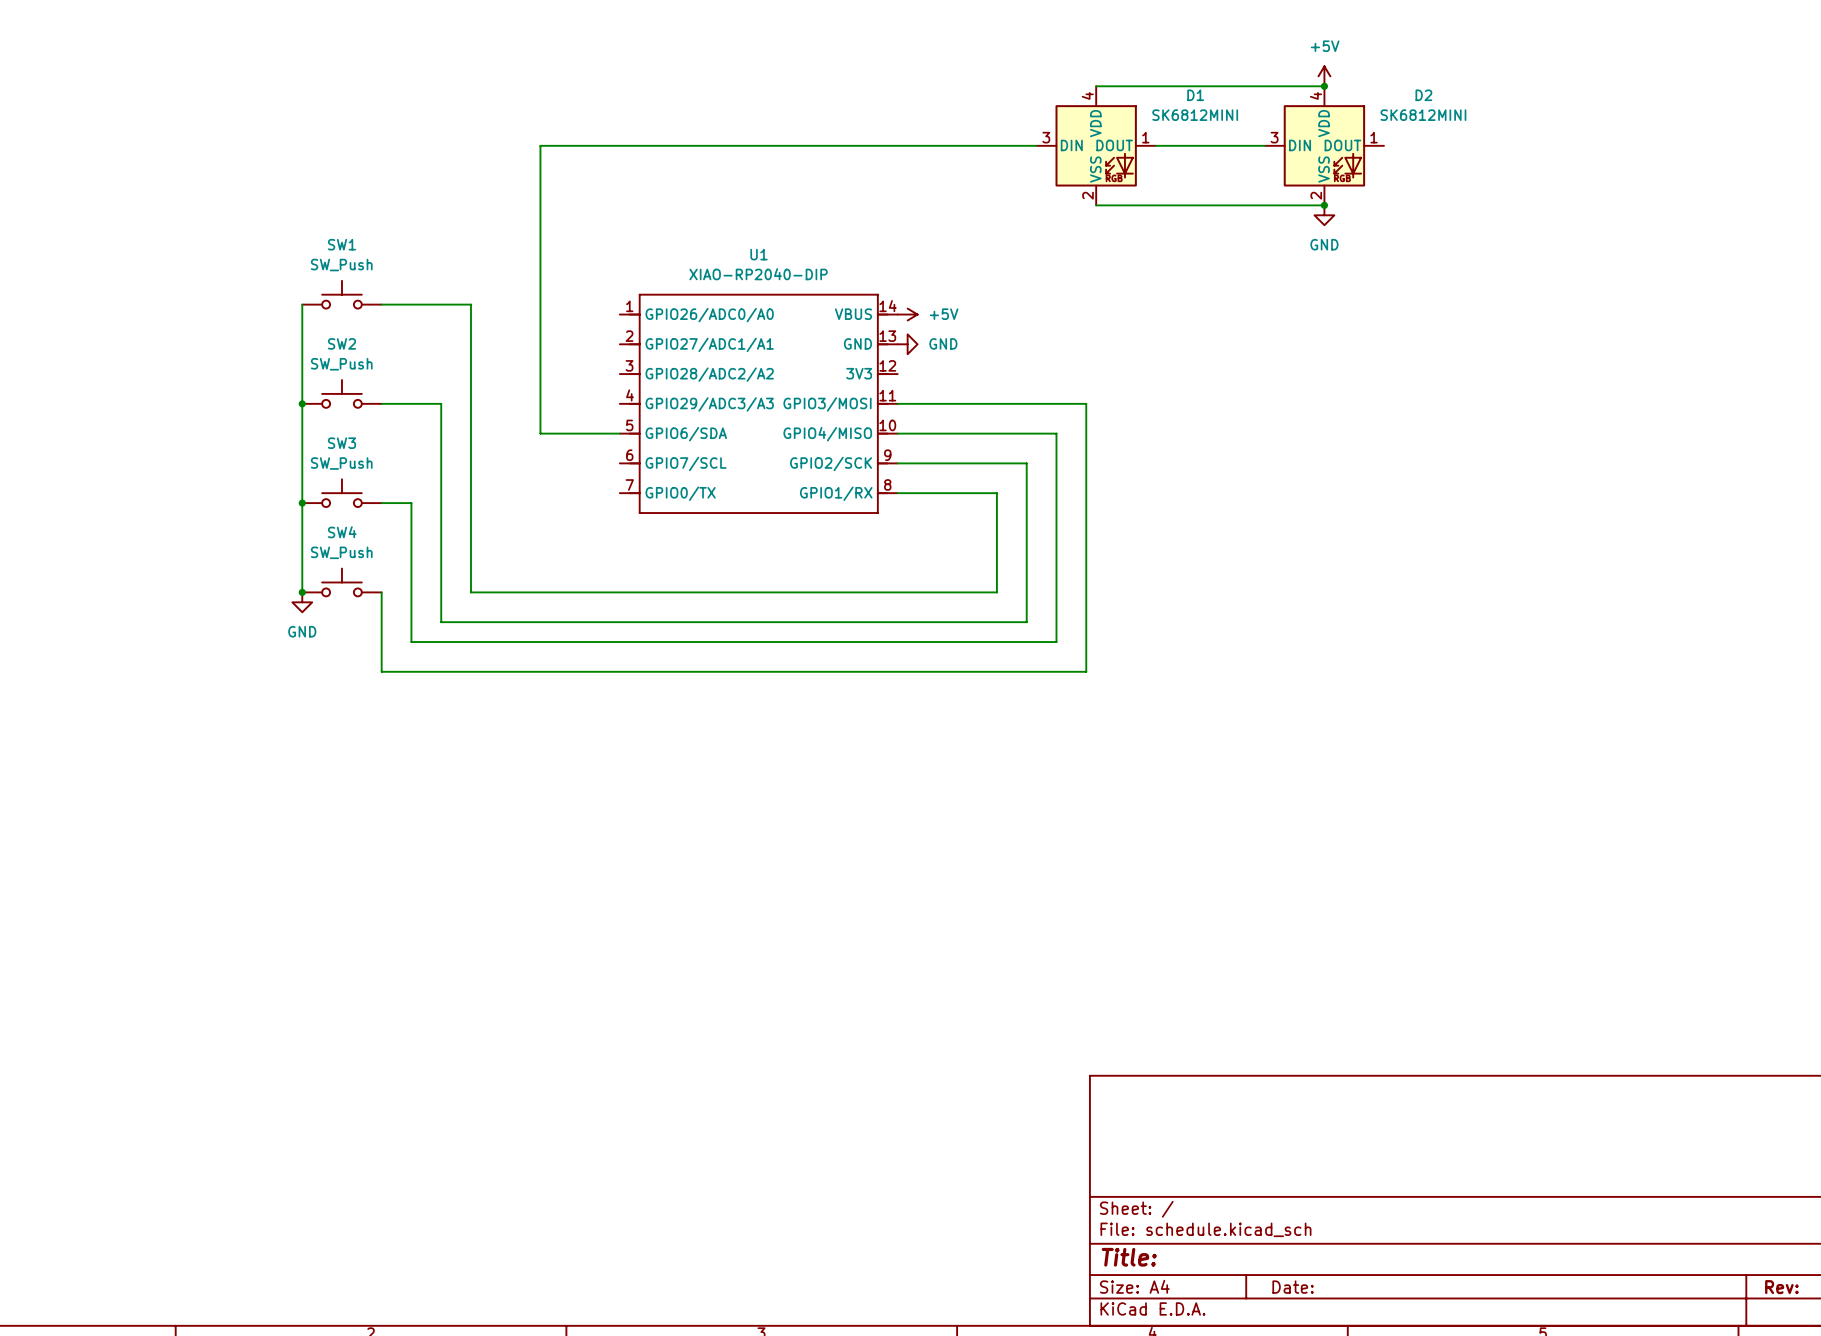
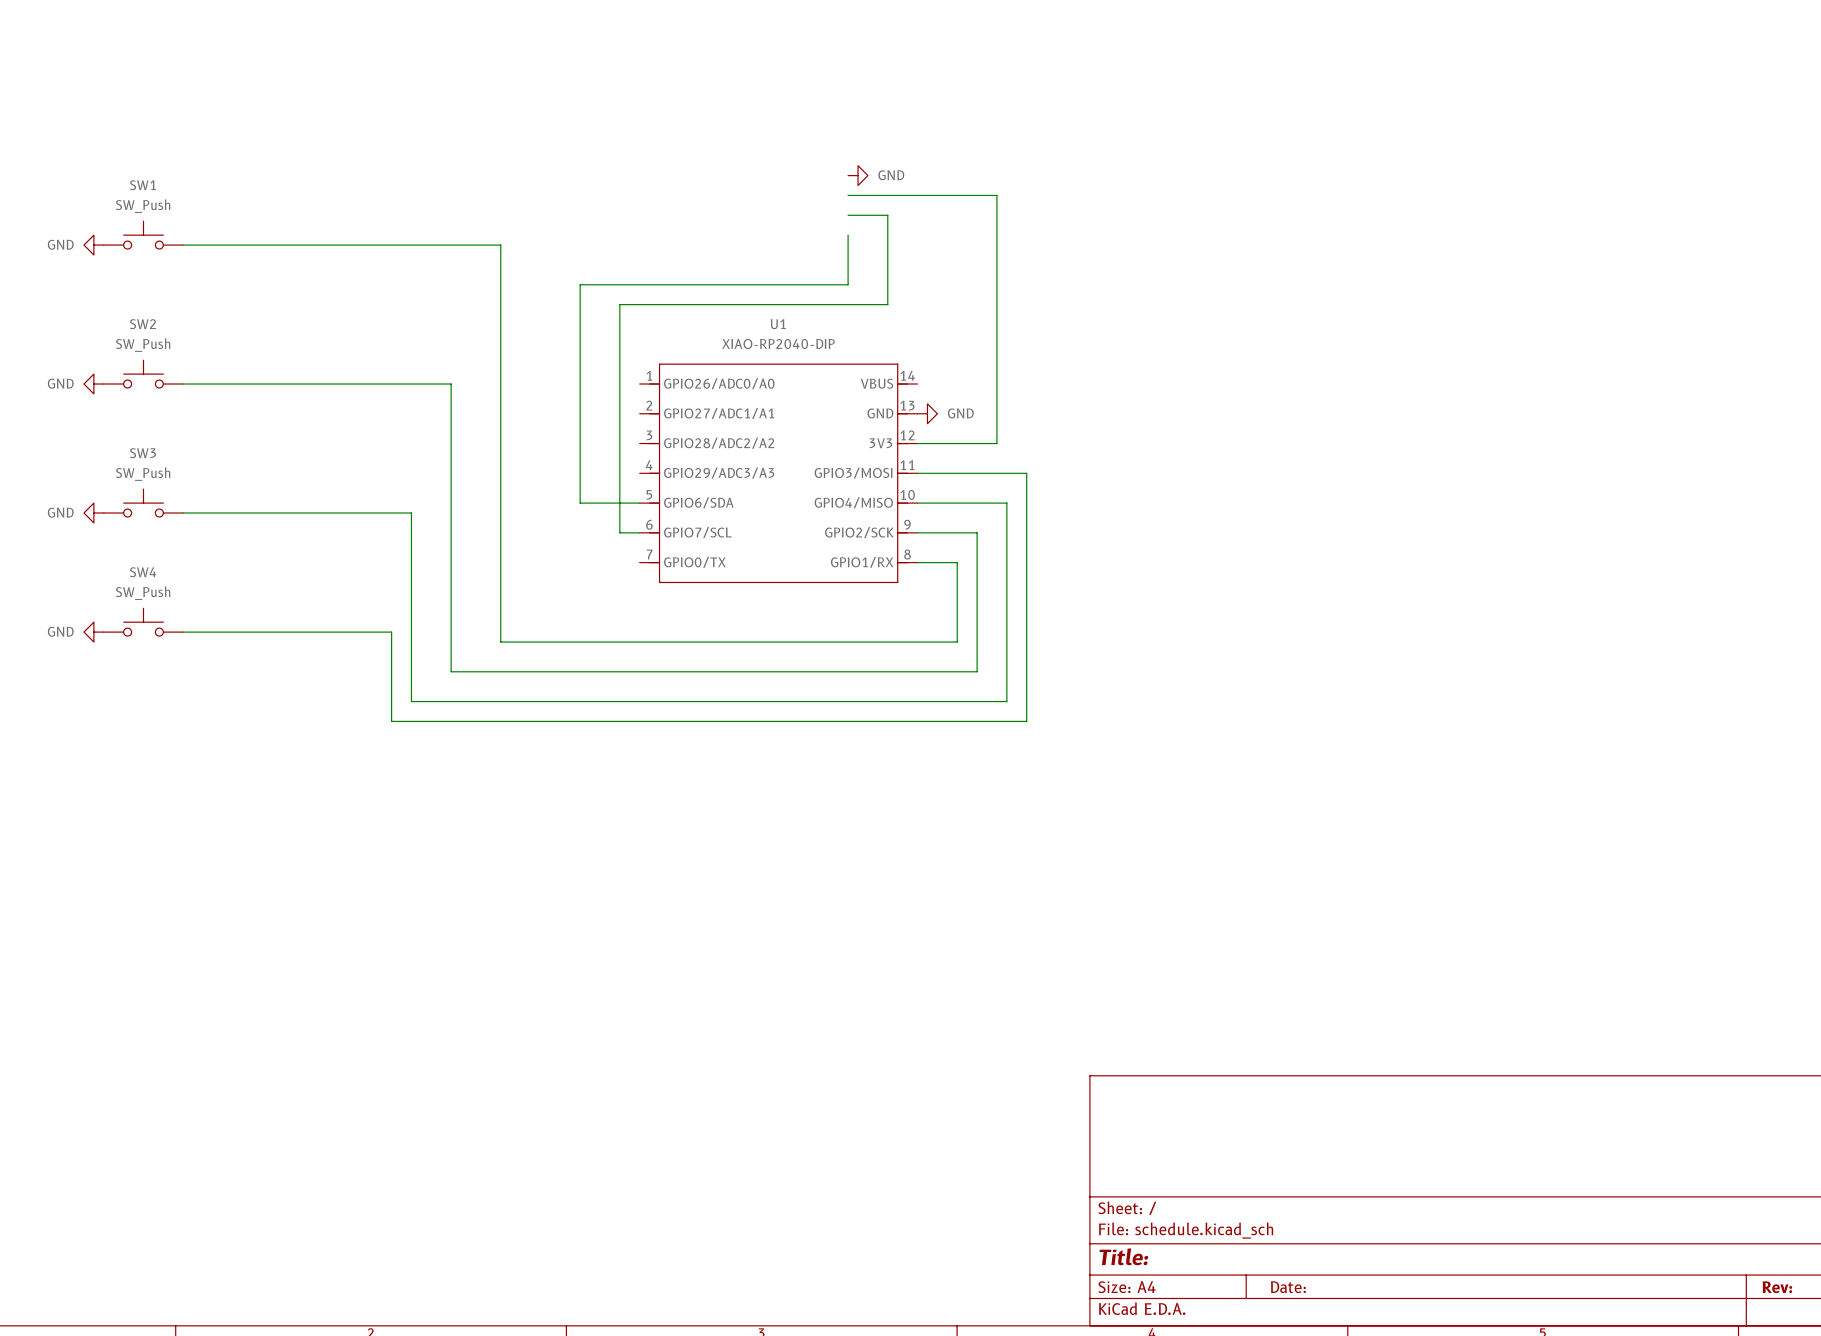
power symbol: +5V (1324, 76) -> none
wire: (1096, 86) (1324, 86) -> none
junction: (1324, 86) -> none
wire: (1036, 145) (540, 145) (540, 433) (619, 433) -> none
D1: SK6812MINI (1096, 145) -> none
wire: (1155, 145) (1264, 145) -> none
D2: SK6812MINI (1324, 145) -> none
power symbol: none -> GND (858, 175)
wire: none -> (848, 195) (996, 195) (996, 443) (917, 443)
wire: (1096, 205) (1324, 205) -> none
junction: (1324, 205) -> none
wire: none -> (848, 215) (887, 215) (887, 304) (619, 304) (619, 532) (639, 532)
power symbol: GND (1324, 215) -> none
wire: none -> (848, 235) (848, 284) (580, 284) (580, 503) (639, 503)
power symbol: none -> GND (93, 245)
wire: none -> (183, 245) (500, 245) (500, 642)
SW1 position: (341, 294) -> (143, 235)
wire: (302, 304) (302, 592) -> none
wire: (381, 304) (470, 304) (470, 592) (996, 592) (996, 493) (897, 493) -> none
power symbol: +5V (907, 314) -> none
power symbol position: GND (907, 344) -> GND (927, 413)
power symbol: none -> GND (93, 384)
SW2 position: (341, 393) -> (143, 374)
junction: (302, 403) -> none
wire: (381, 403) (441, 403) (441, 622) (1026, 622) -> (183, 632) (391, 632) (391, 721) (1026, 721) (1026, 622)
U1 position: (758, 403) -> (778, 473)
wire: (897, 403) (1086, 403) (1086, 671) (977, 671) -> (917, 532) (977, 532) (977, 671)
wire: (897, 433) (1056, 433) (1056, 642) (957, 642) -> (917, 562) (957, 562) (957, 642)
wire: (897, 463) (1026, 463) (1026, 473) -> (917, 473) (1026, 473)
SW3 position: (341, 493) -> (143, 503)
junction: (302, 503) -> none
wire: (381, 503) (411, 503) (411, 513) -> (183, 513) (411, 513)
power symbol: none -> GND (93, 513)
SW4 position: (341, 582) -> (143, 622)
junction: (302, 592) -> none
wire: (381, 592) (381, 671) (451, 671) -> (183, 384) (451, 384) (451, 671)
power symbol: GND (302, 602) -> none
power symbol: none -> GND (93, 632)
wire: (411, 642) (500, 642) -> (411, 642) (411, 701) (1006, 701) (1006, 503) (917, 503)

